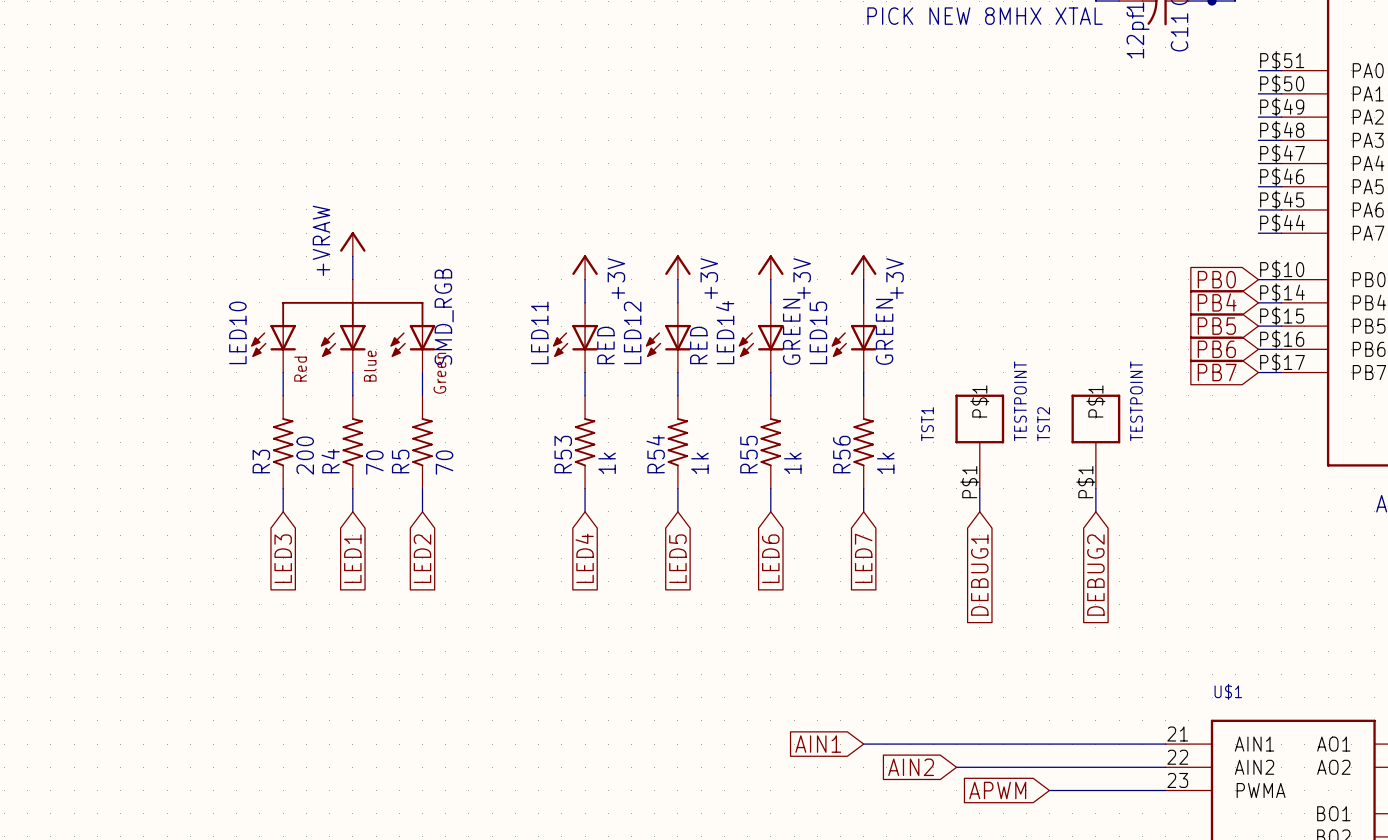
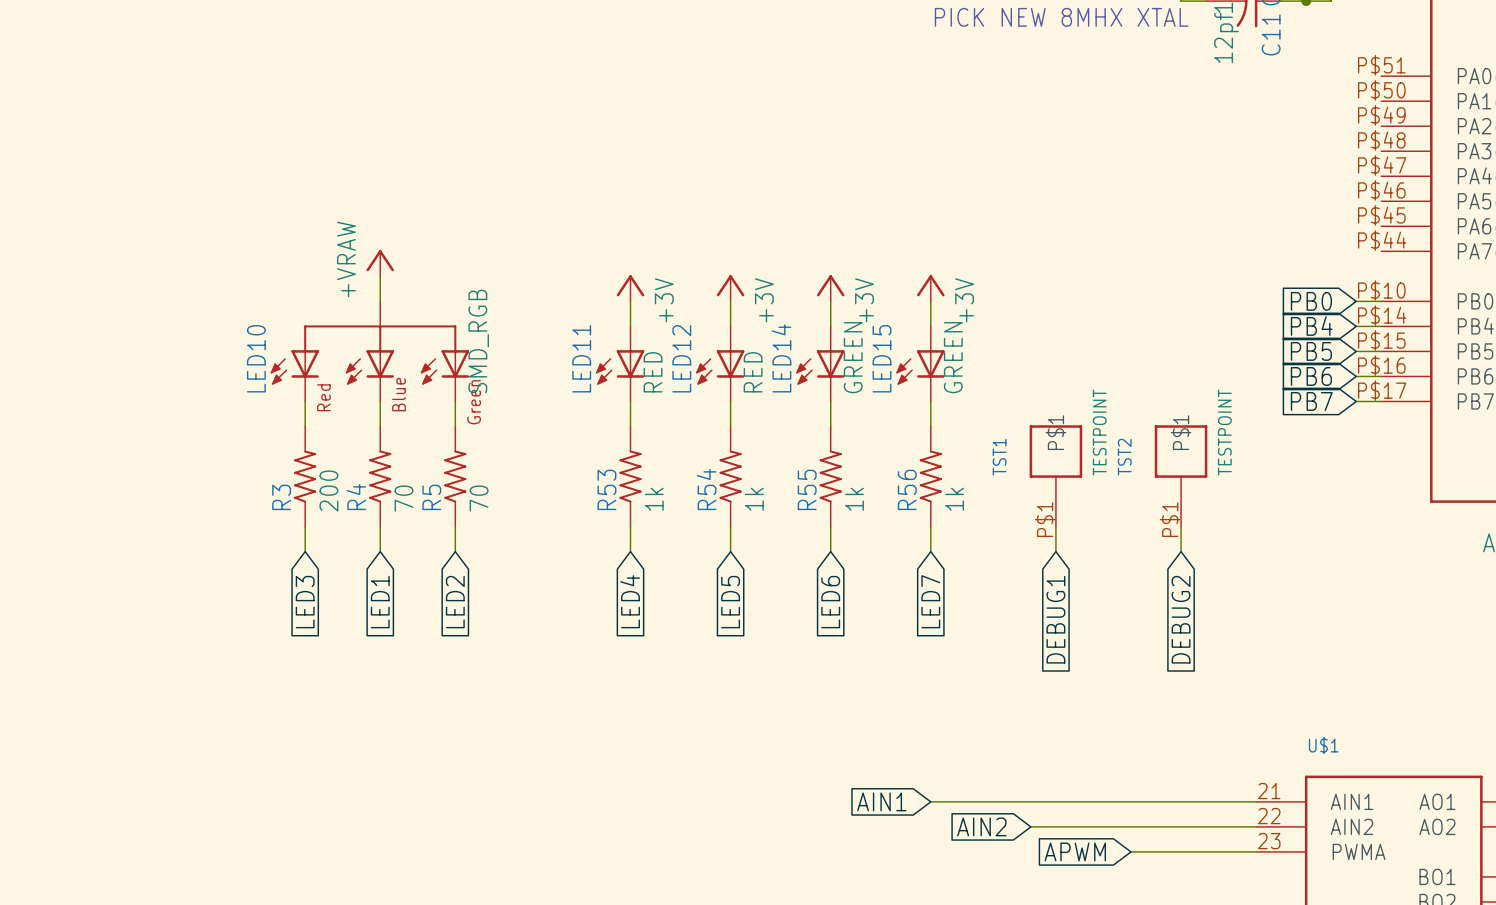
wire: (1258, 70) (1281, 70) -> none
wire: (1258, 93) (1281, 93) -> none
wire: (1258, 117) (1281, 117) -> none
wire: (1258, 140) (1281, 140) -> none
wire: (1258, 163) (1281, 163) -> none
wire: (1258, 186) (1281, 186) -> none
wire: (1258, 209) (1281, 209) -> none
wire: (1258, 233) (1281, 233) -> none

